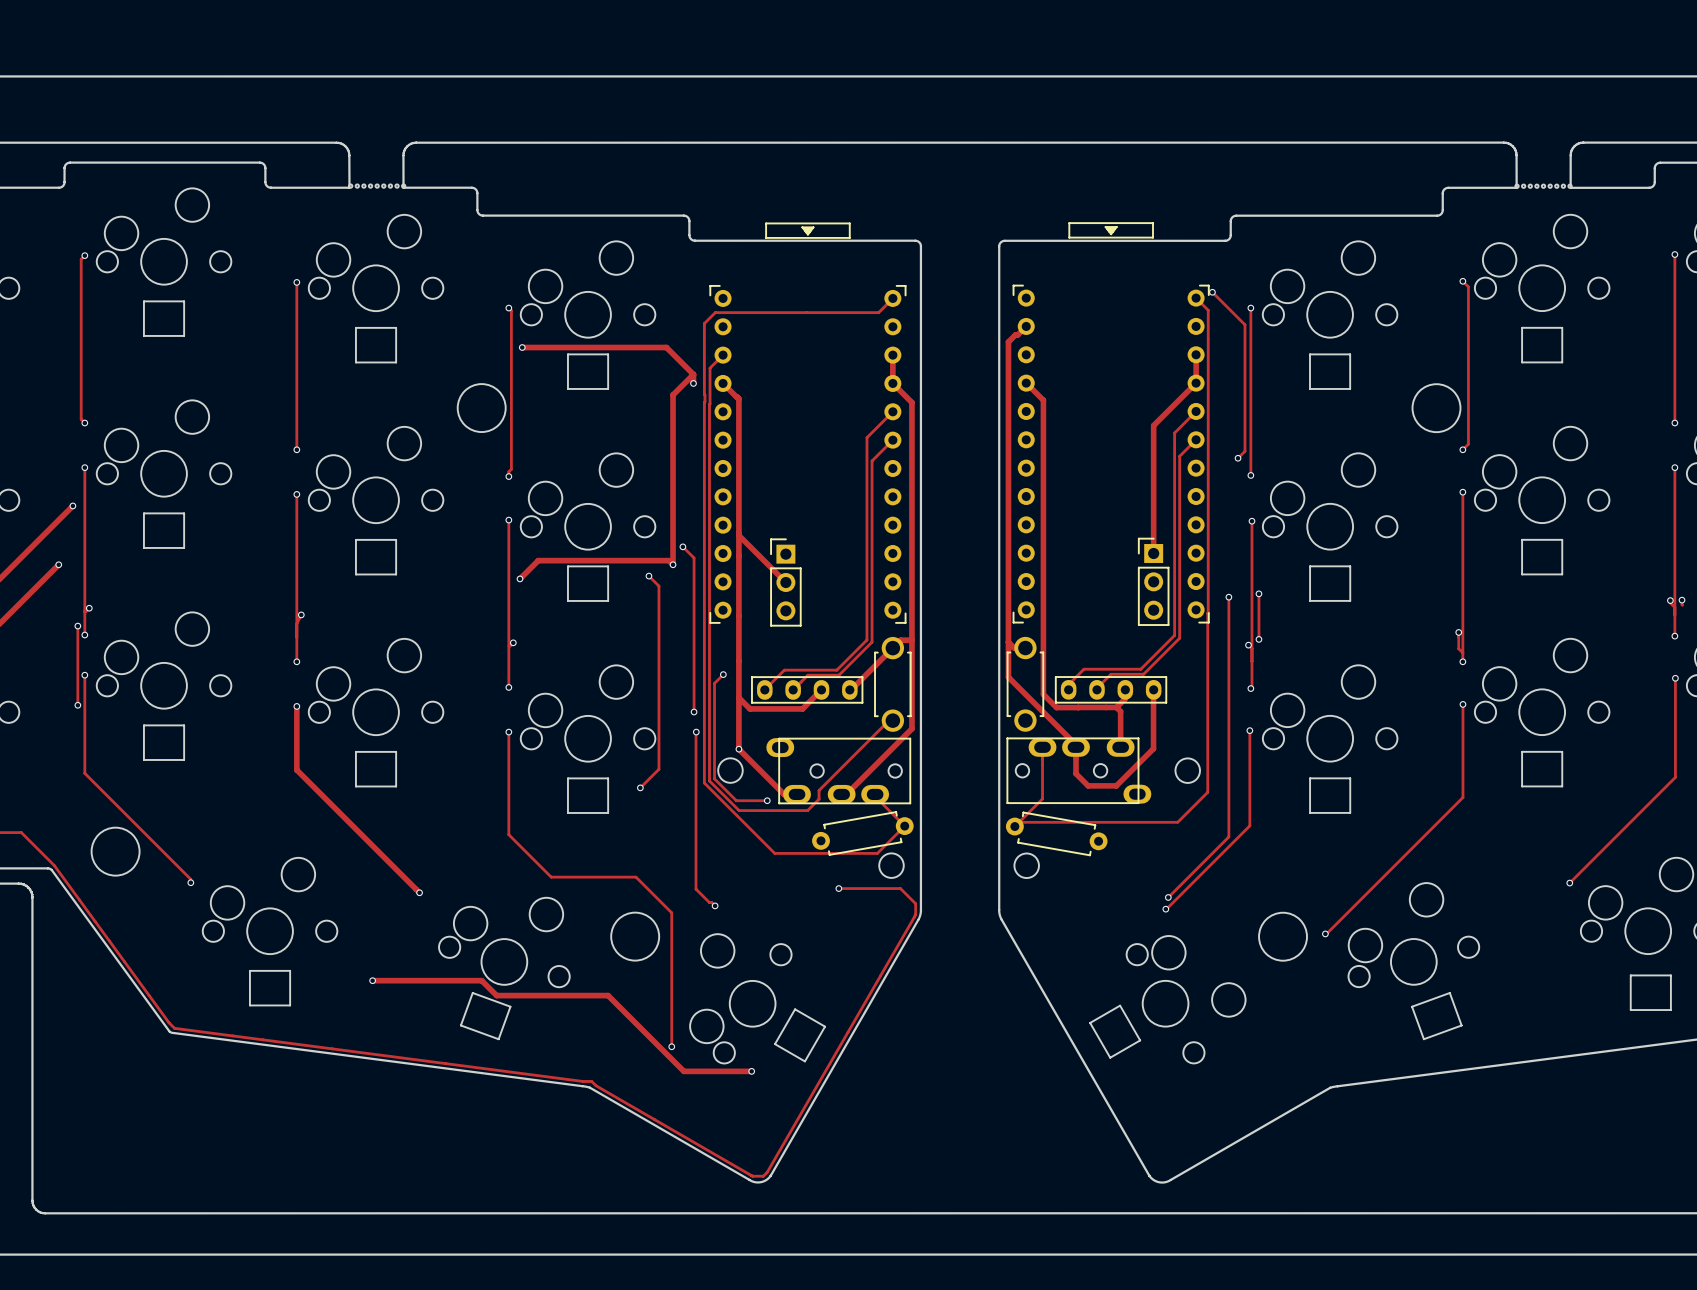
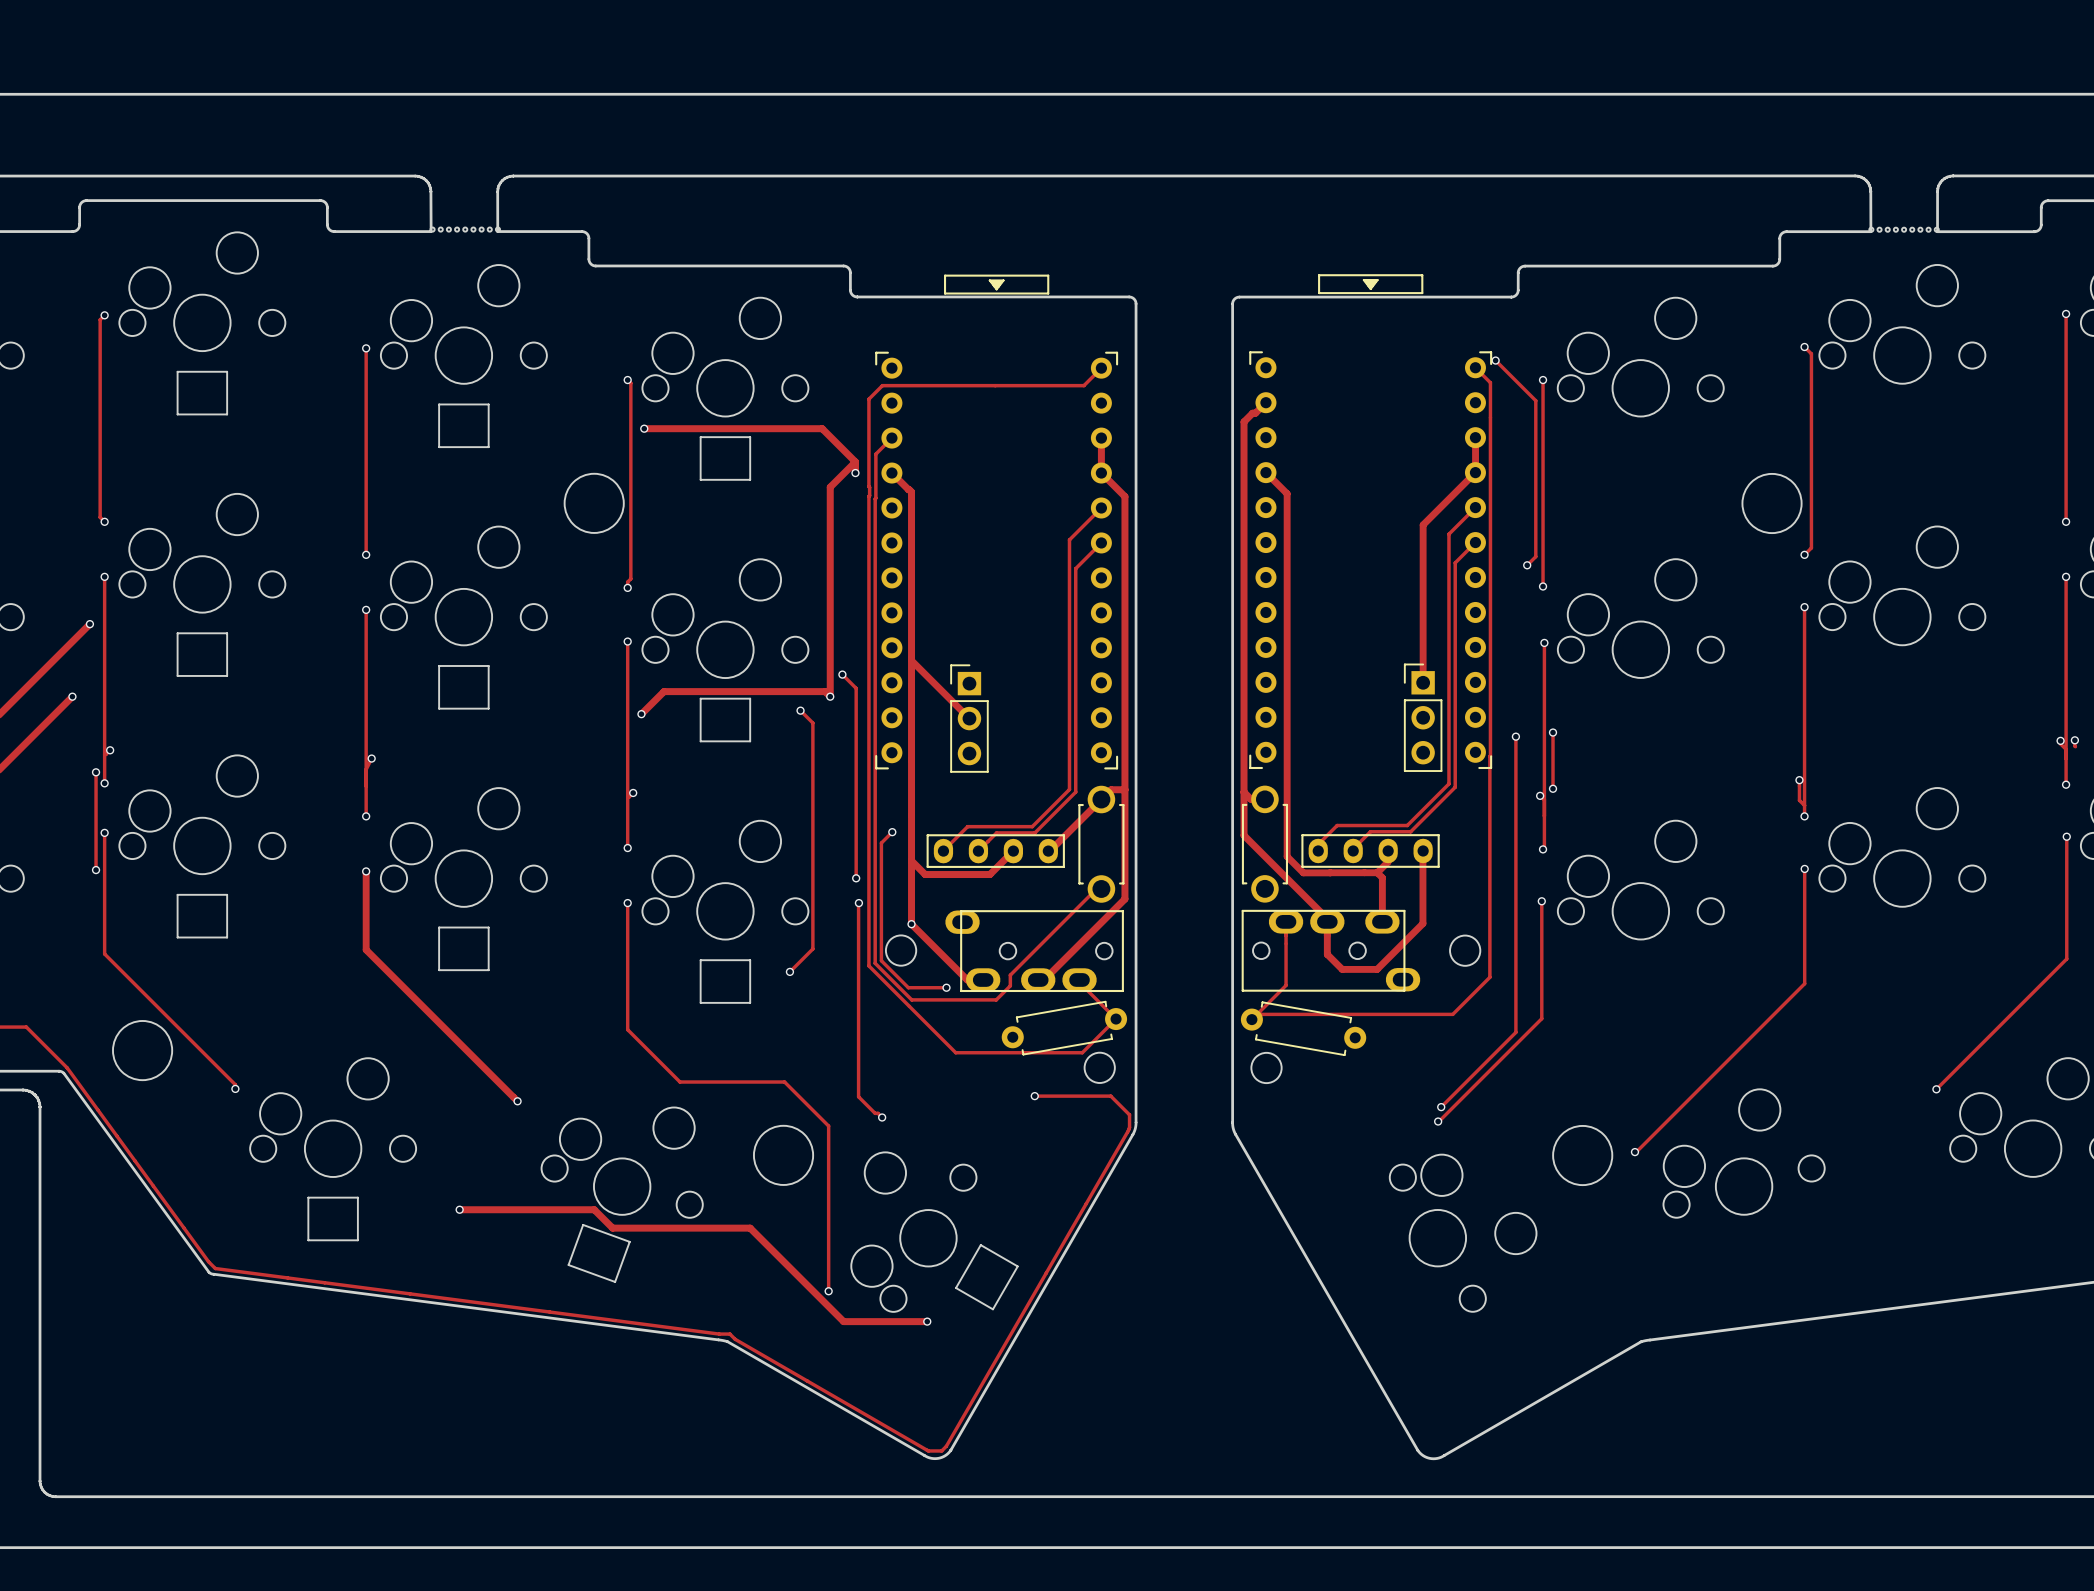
part: (1542, 345) -> none
part: (1330, 371) -> none
part: (1542, 557) -> none
part: (1330, 583) -> none
part: (1542, 769) -> none
part: (1330, 795) -> none
part: (1650, 992) -> none
part: (1436, 1016) -> none
part: (1115, 1031) -> none

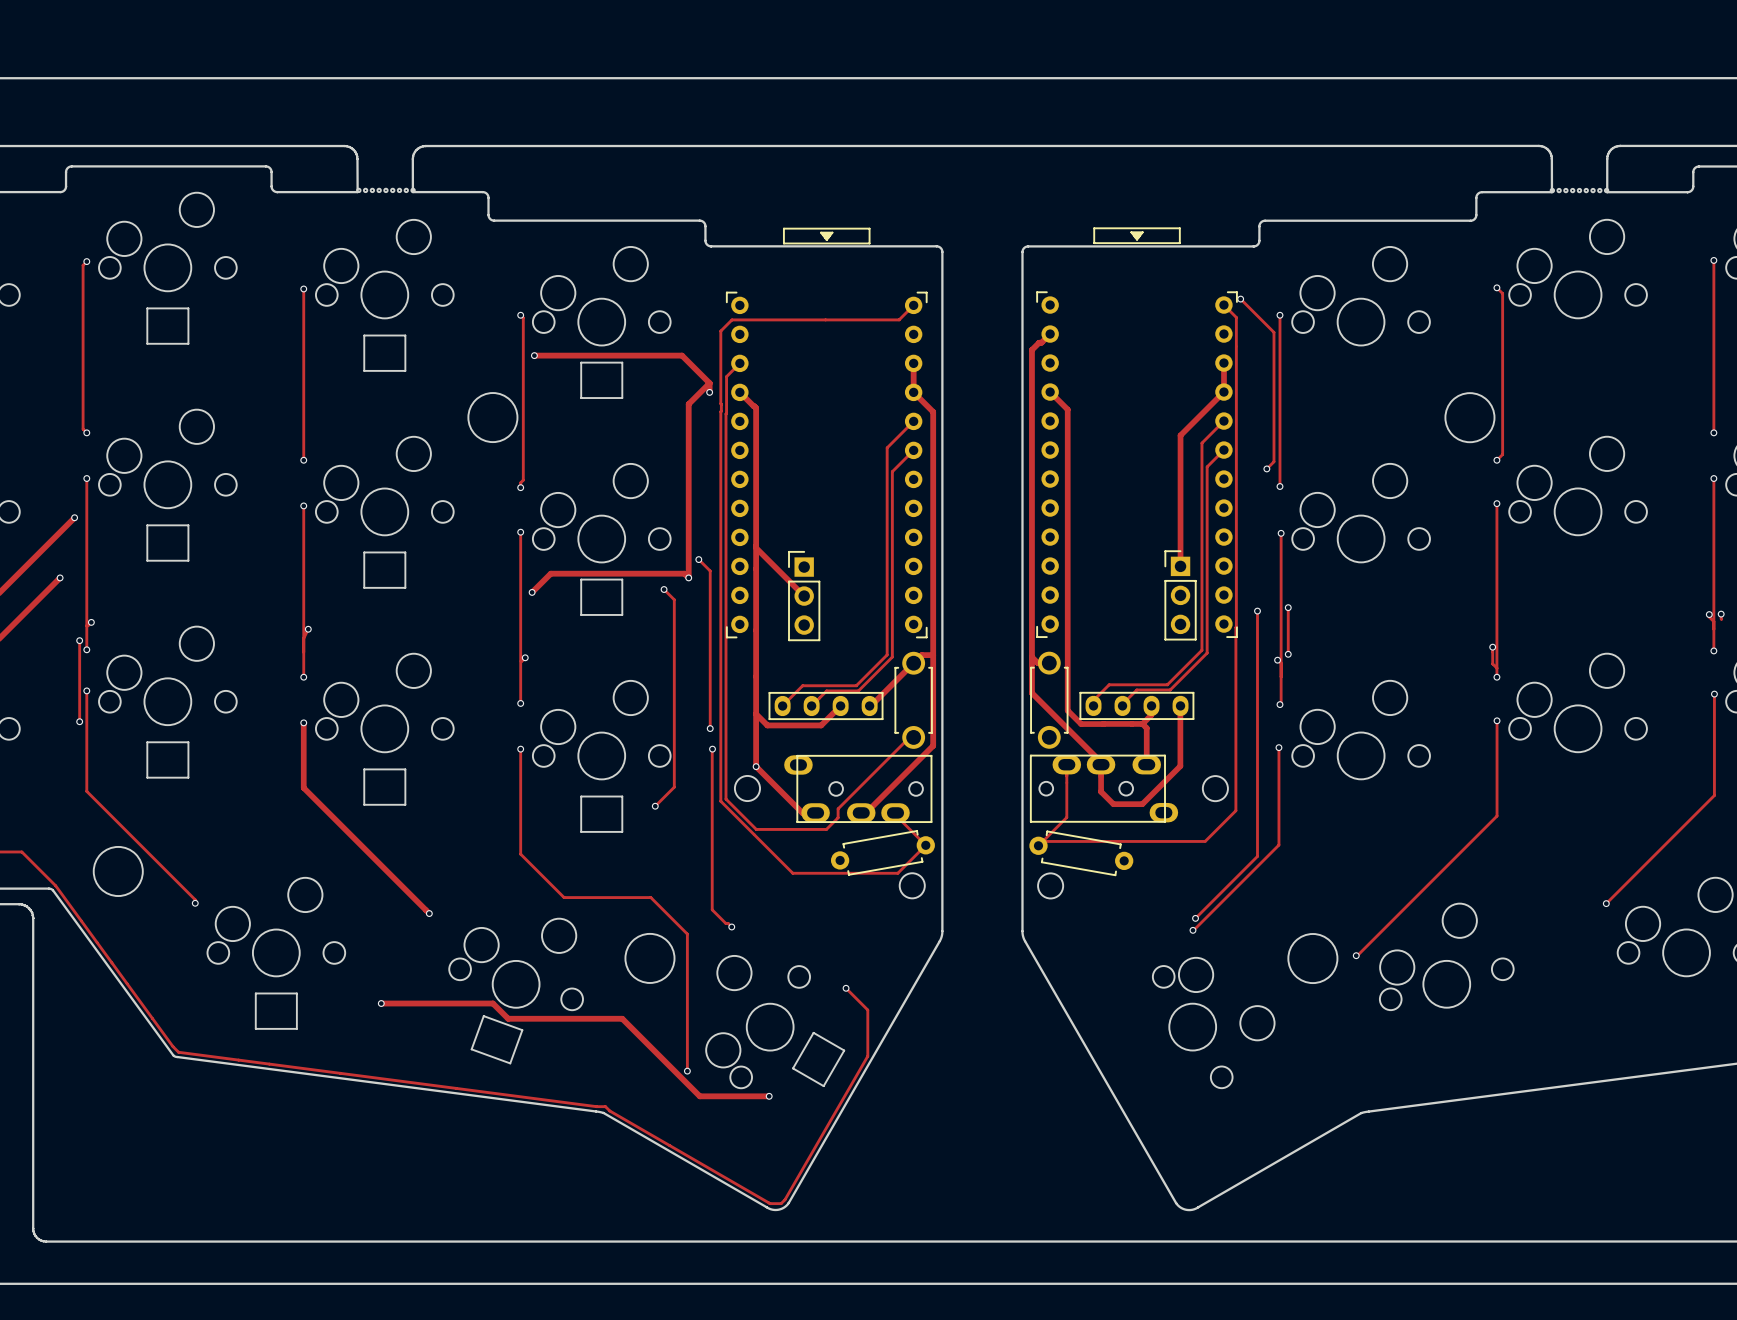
track: (892, 832) (881, 843) (881, 960) (908, 987) (946, 987) -> none
via: (892, 832) -> none
via: (946, 987) -> none
track: (1034, 1096) (1110, 1096) (1129, 1114) (1127, 1131) (1046, 1273) -> (846, 988) (867, 1010) (867, 1056)
via: (1034, 1096) -> none
via: none -> (846, 988)

